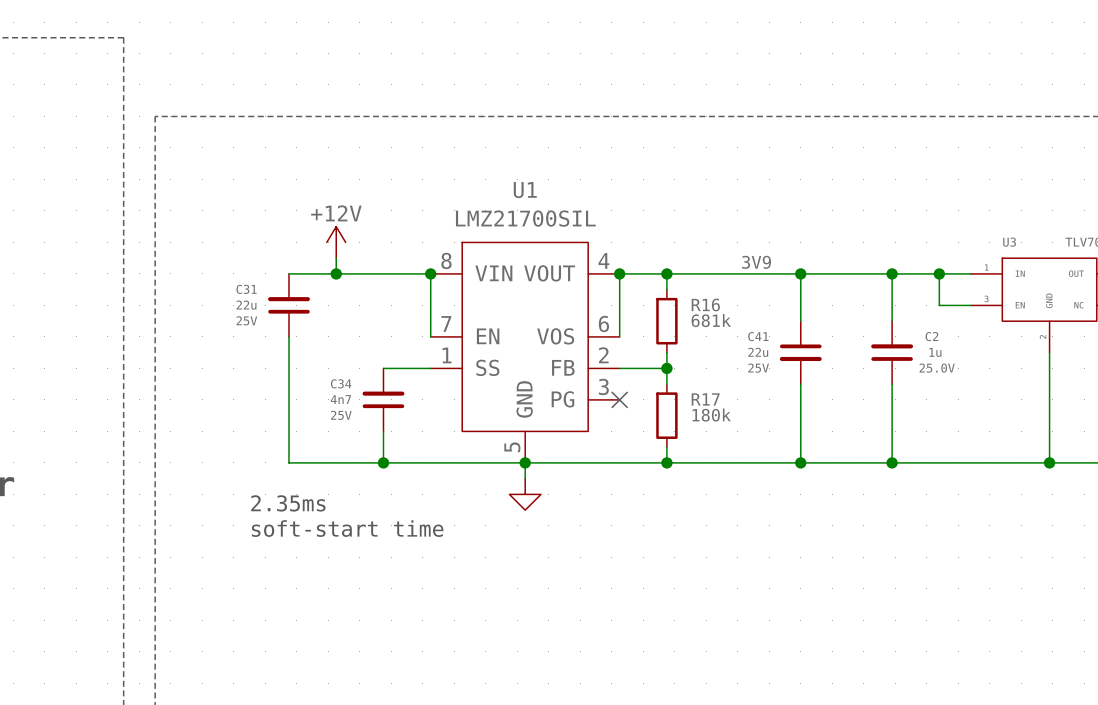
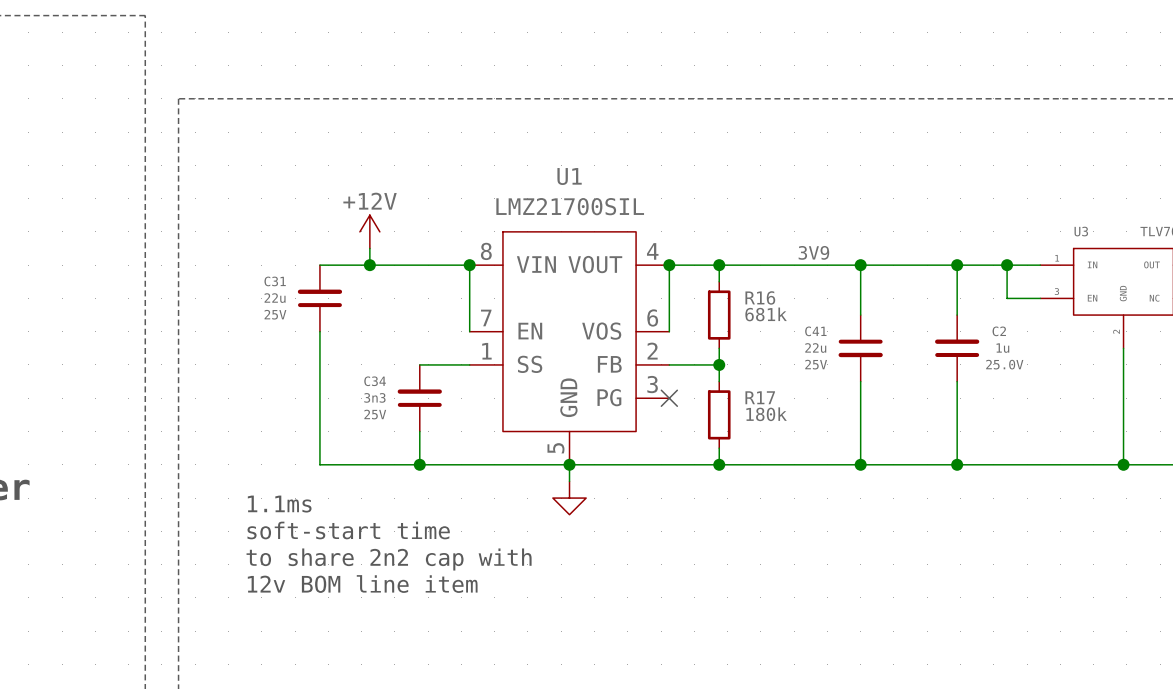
C34 value: 4n7 (340, 399) -> 3n3 (374, 397)
text: none -> 1.1ms (279, 504)
text: 2.35ms (288, 503) -> none
text position: soft-start time (347, 528) -> soft-start time (348, 530)
text: none -> to share 2n2 cap with (389, 559)
text: none -> 12v BOM line item (362, 584)

